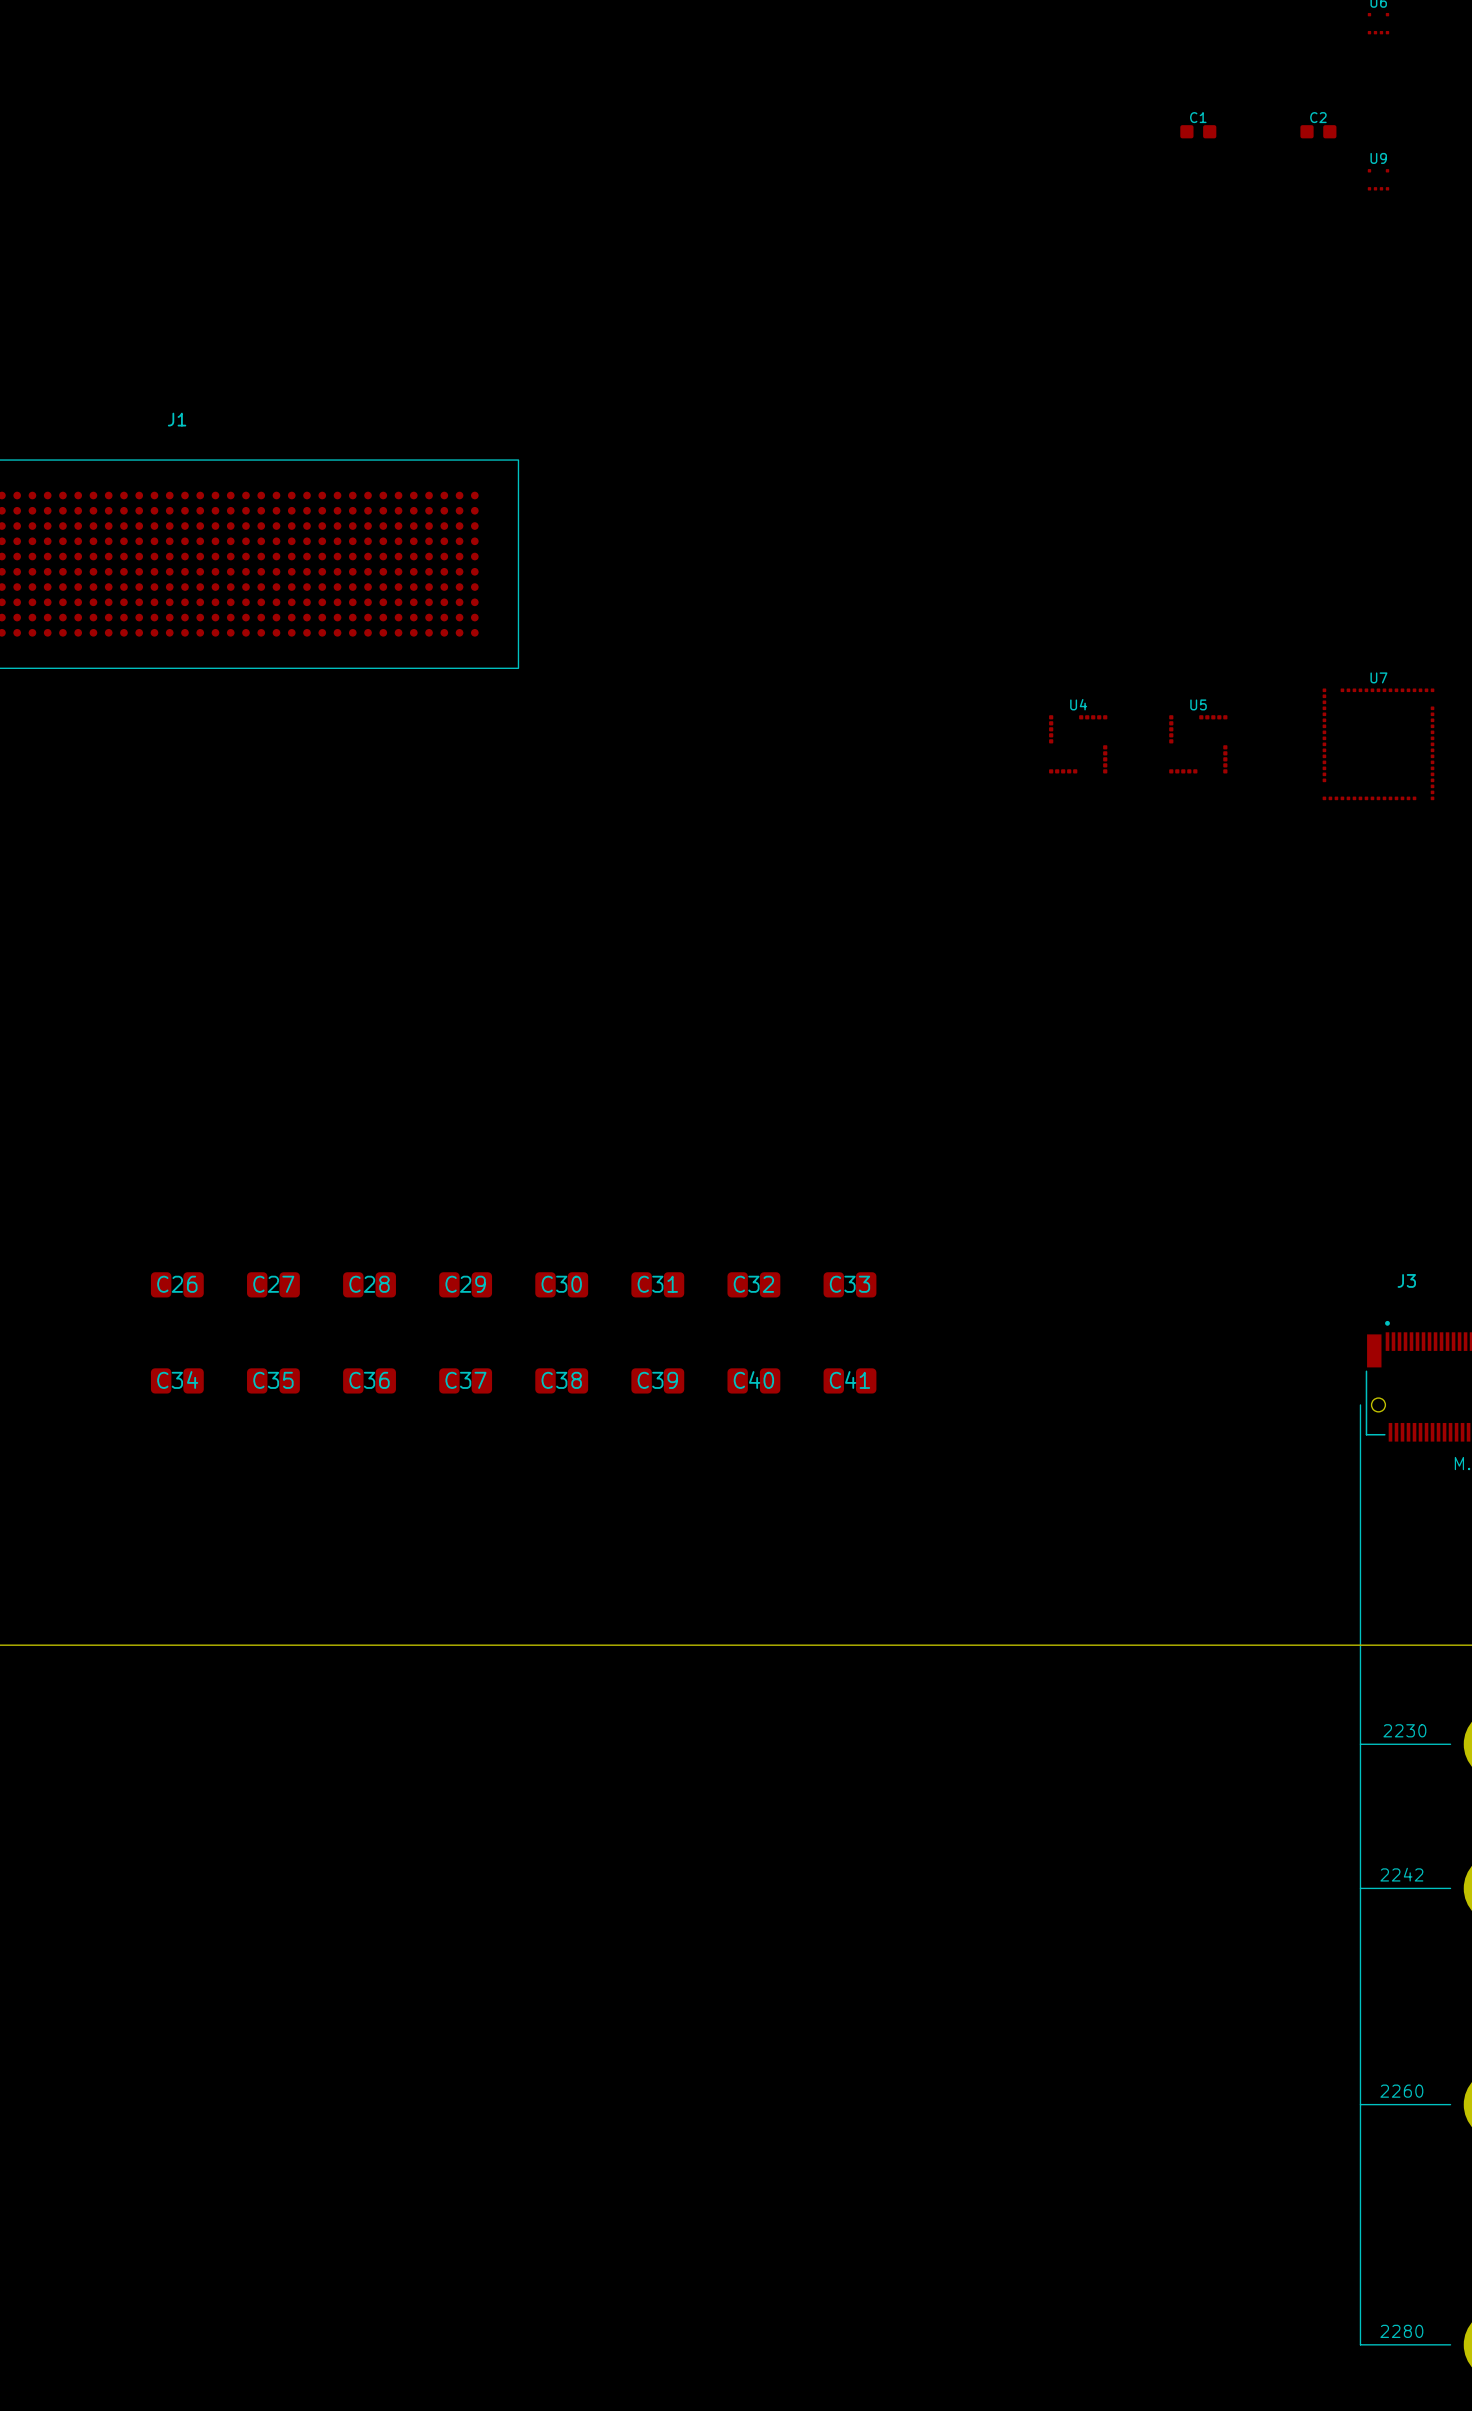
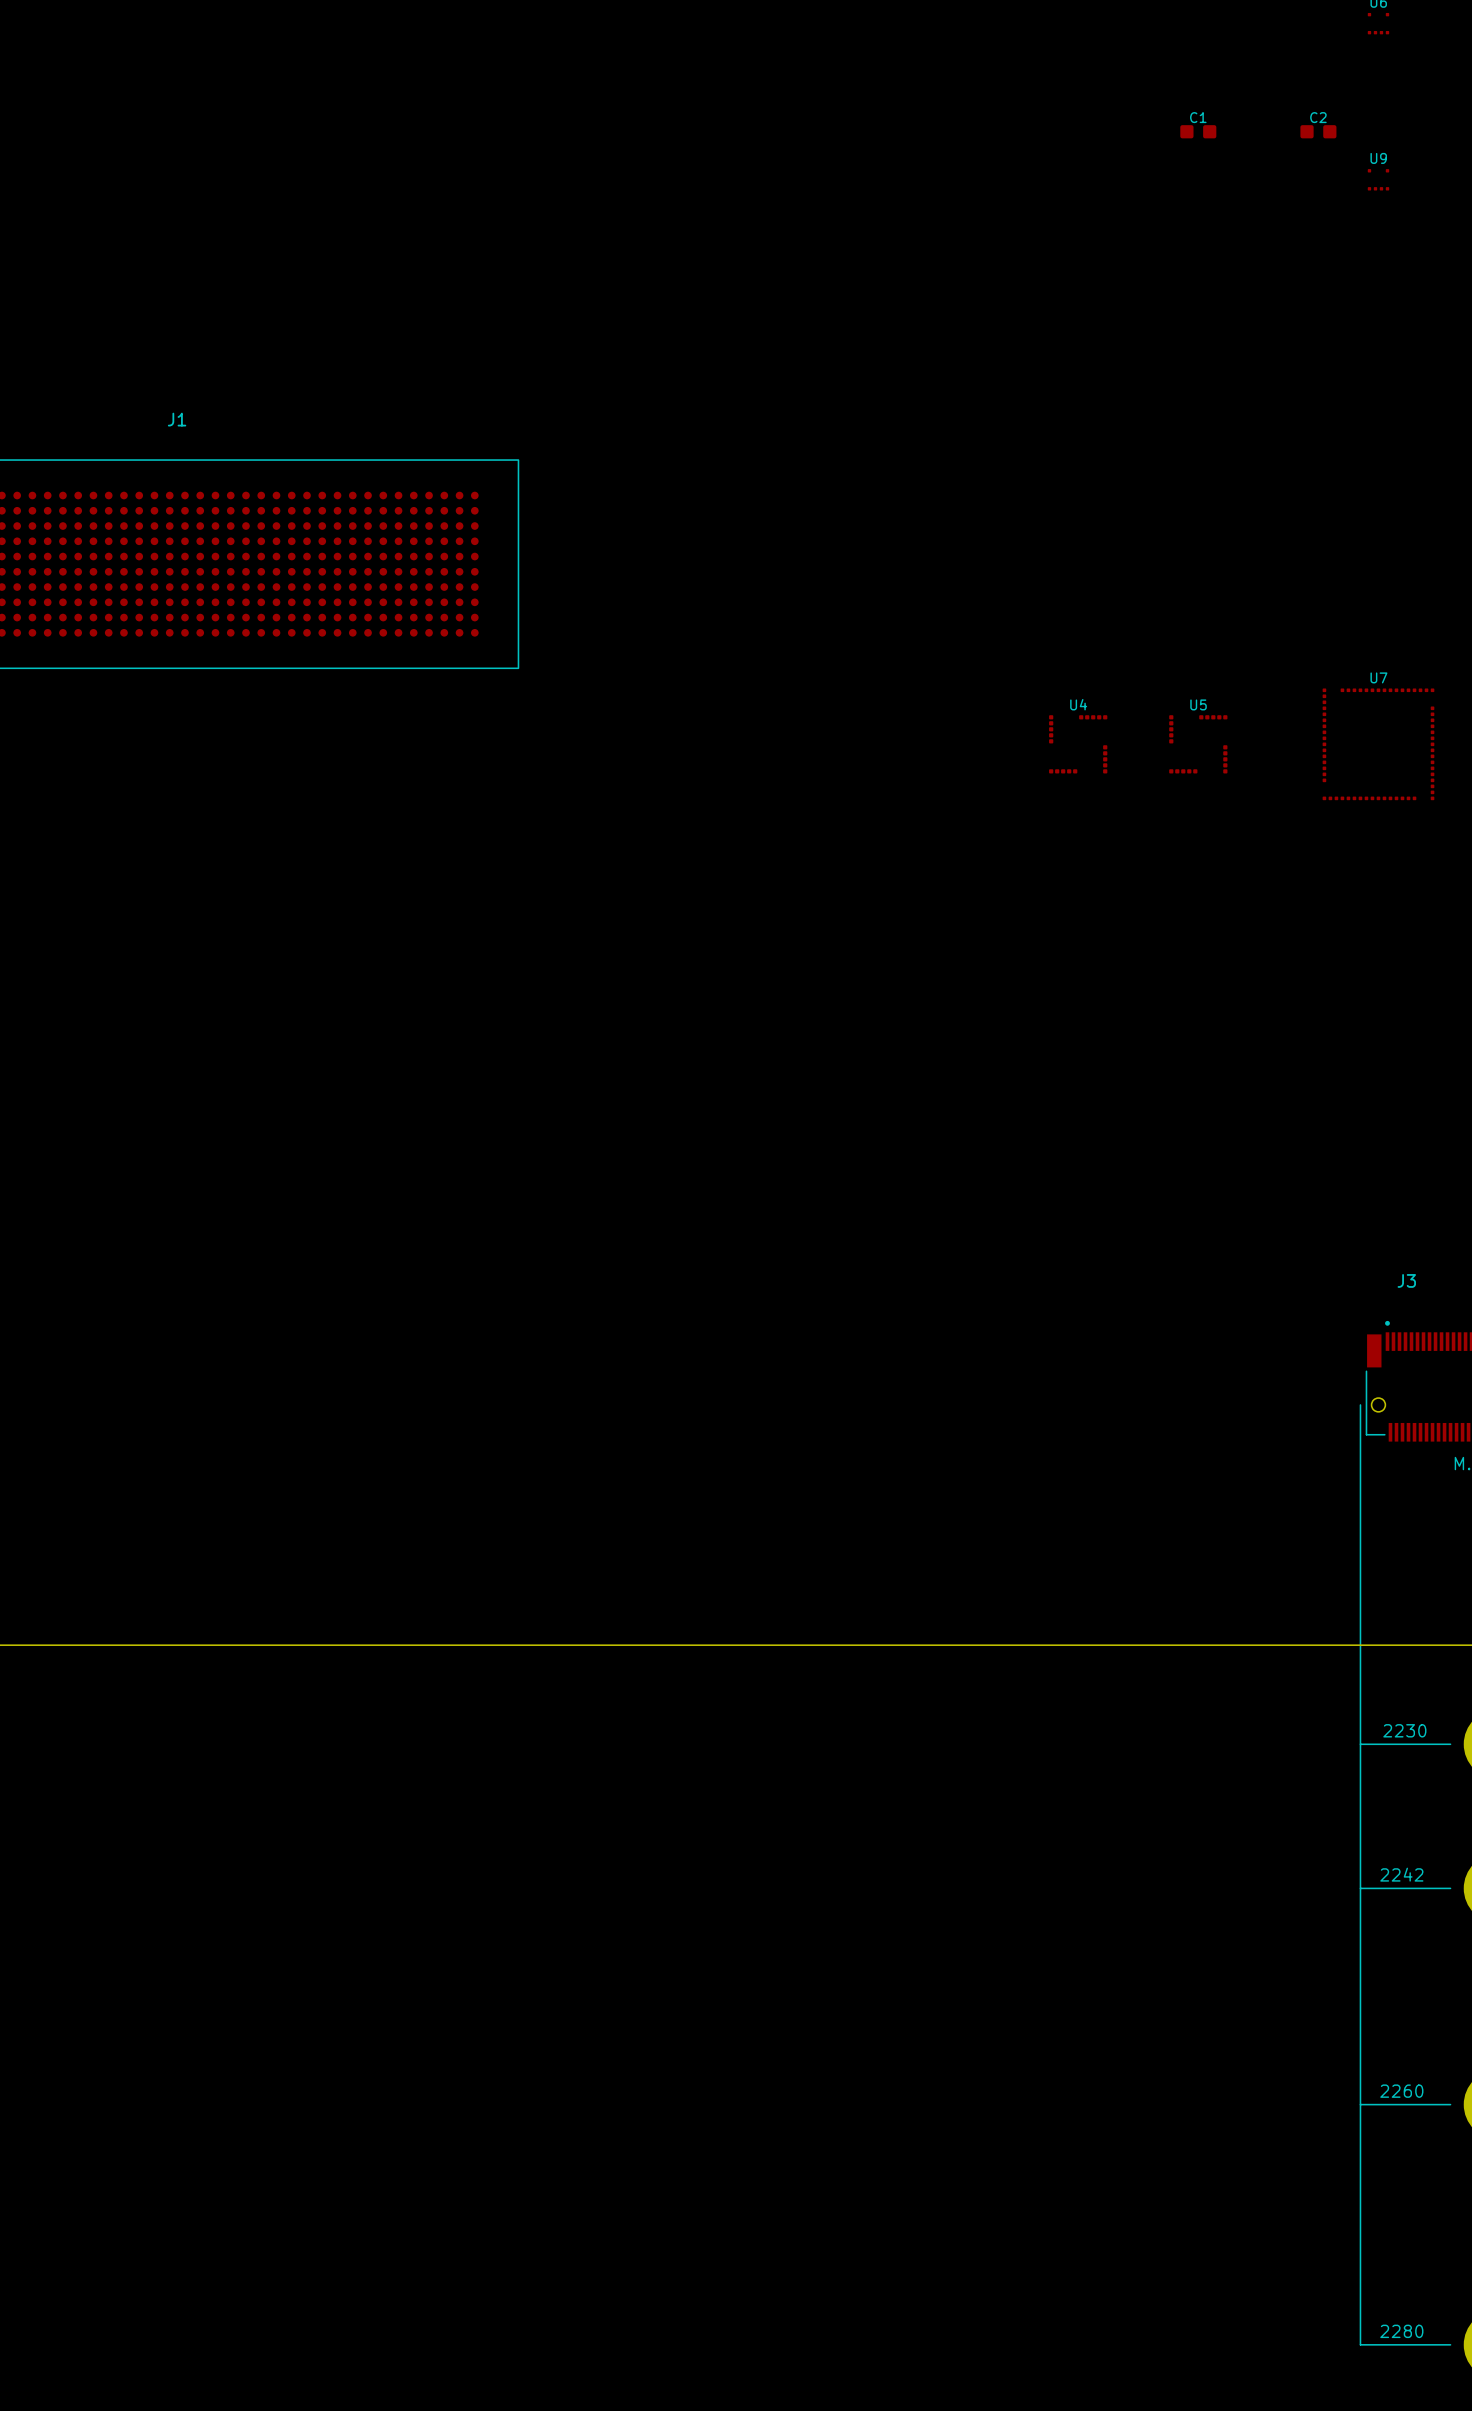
C26: (177, 1284) -> none
C27: (273, 1284) -> none
C28: (369, 1284) -> none
C29: (465, 1284) -> none
C30: (561, 1284) -> none
C31: (657, 1284) -> none
C32: (753, 1284) -> none
C33: (849, 1284) -> none
C34: (177, 1380) -> none
C35: (273, 1380) -> none
C36: (369, 1380) -> none
C37: (465, 1380) -> none
C38: (561, 1380) -> none
C39: (657, 1380) -> none
C40: (753, 1380) -> none
C41: (849, 1380) -> none

